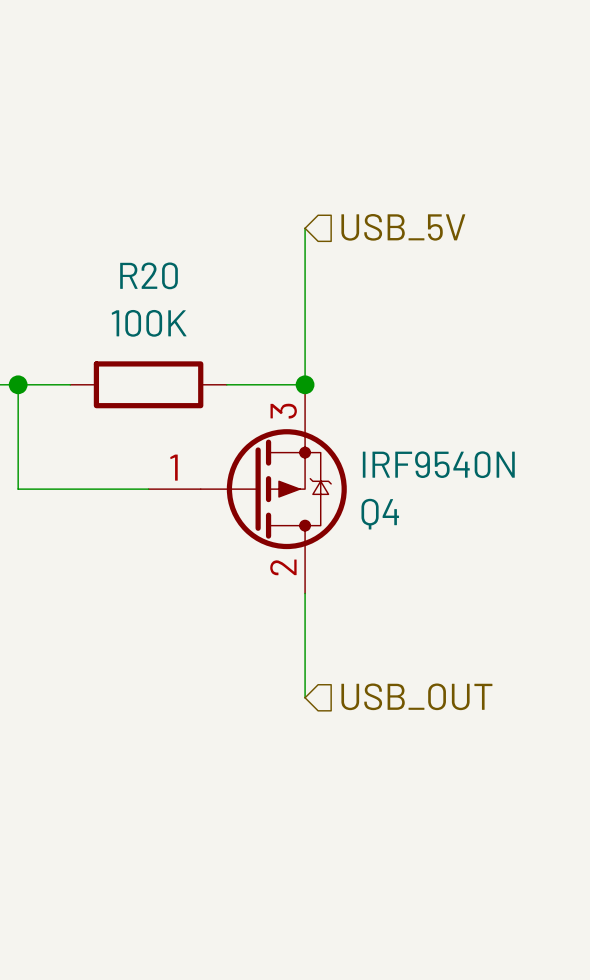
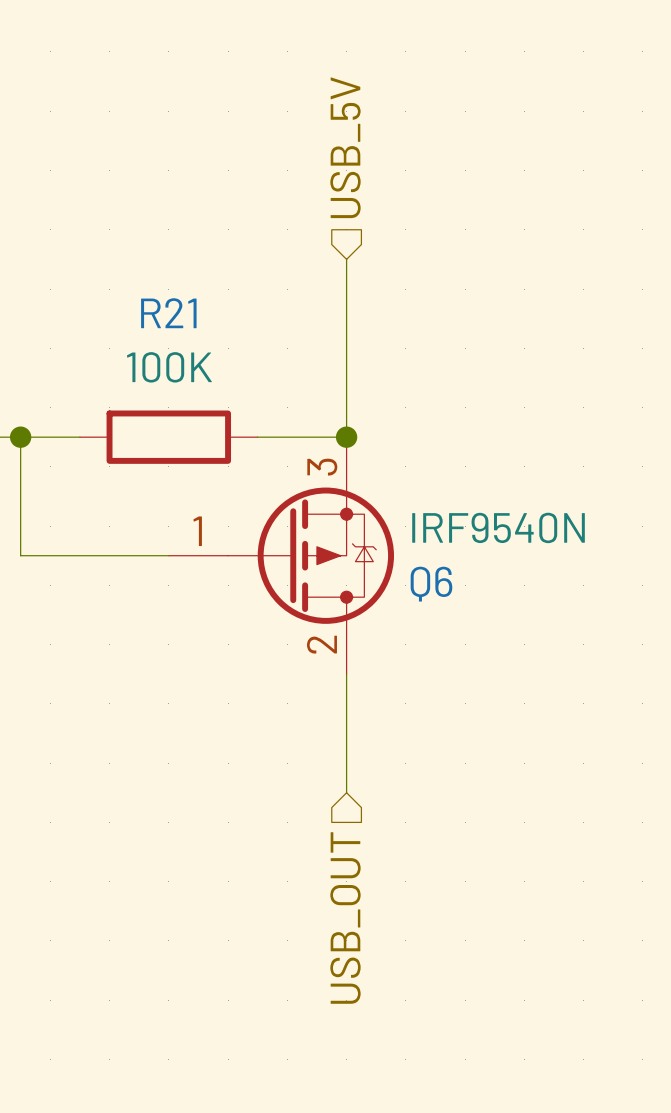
hierarchical label rotation: 0° (403, 227) -> 90° counterclockwise (345, 147)
R20 name: R20 (149, 275) -> R21 (168, 313)
Q4 name: Q4 (380, 514) -> Q6 (431, 584)
hierarchical label rotation: 0° (416, 696) -> 90° clockwise (345, 918)

